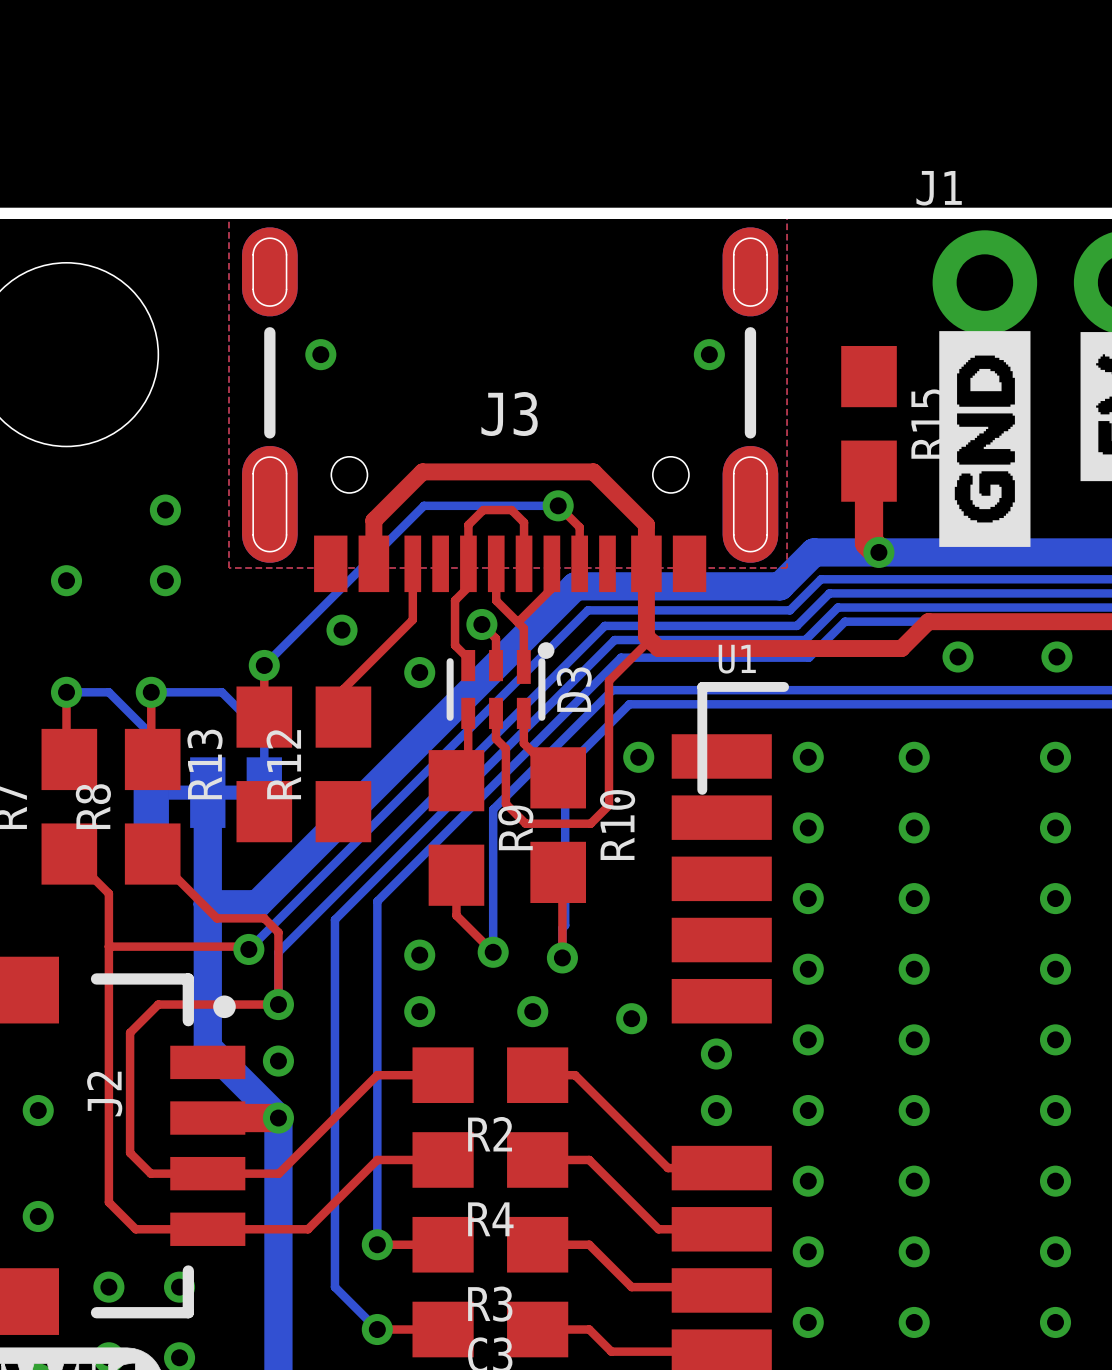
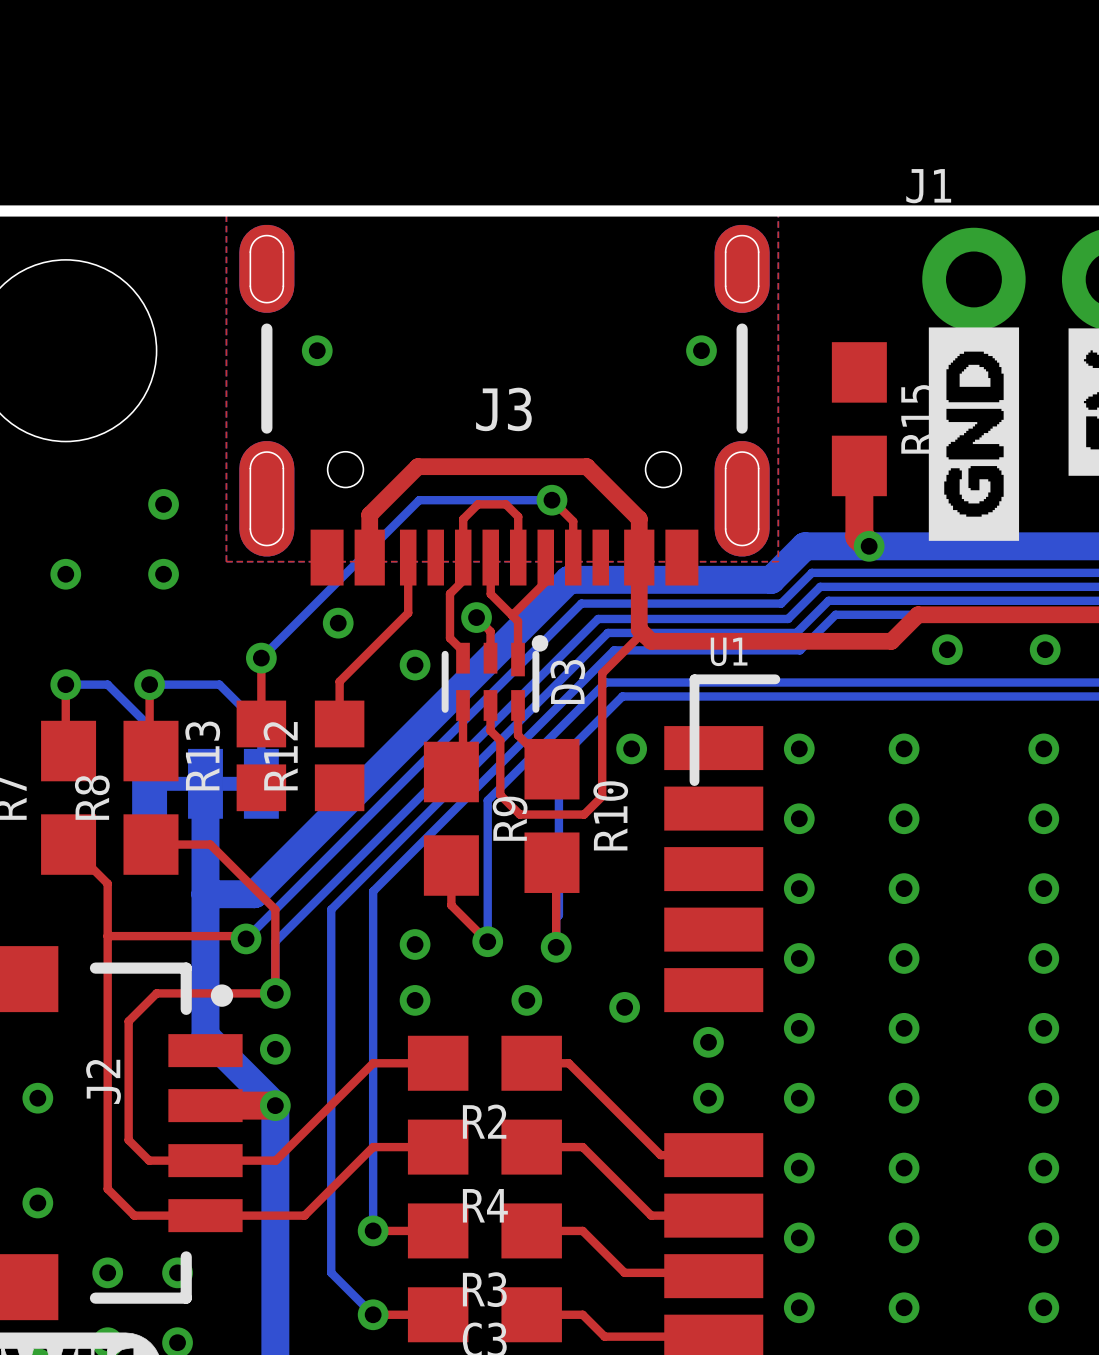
R13 footprint: [236, 686, 293, 843] -> [236, 700, 287, 812]
R12 footprint: [315, 686, 372, 843] -> [314, 700, 365, 812]
top track: (152, 854) (217, 918) (264, 918) (278, 932) -> (151, 844) (210, 844) (275, 909) (275, 922)

